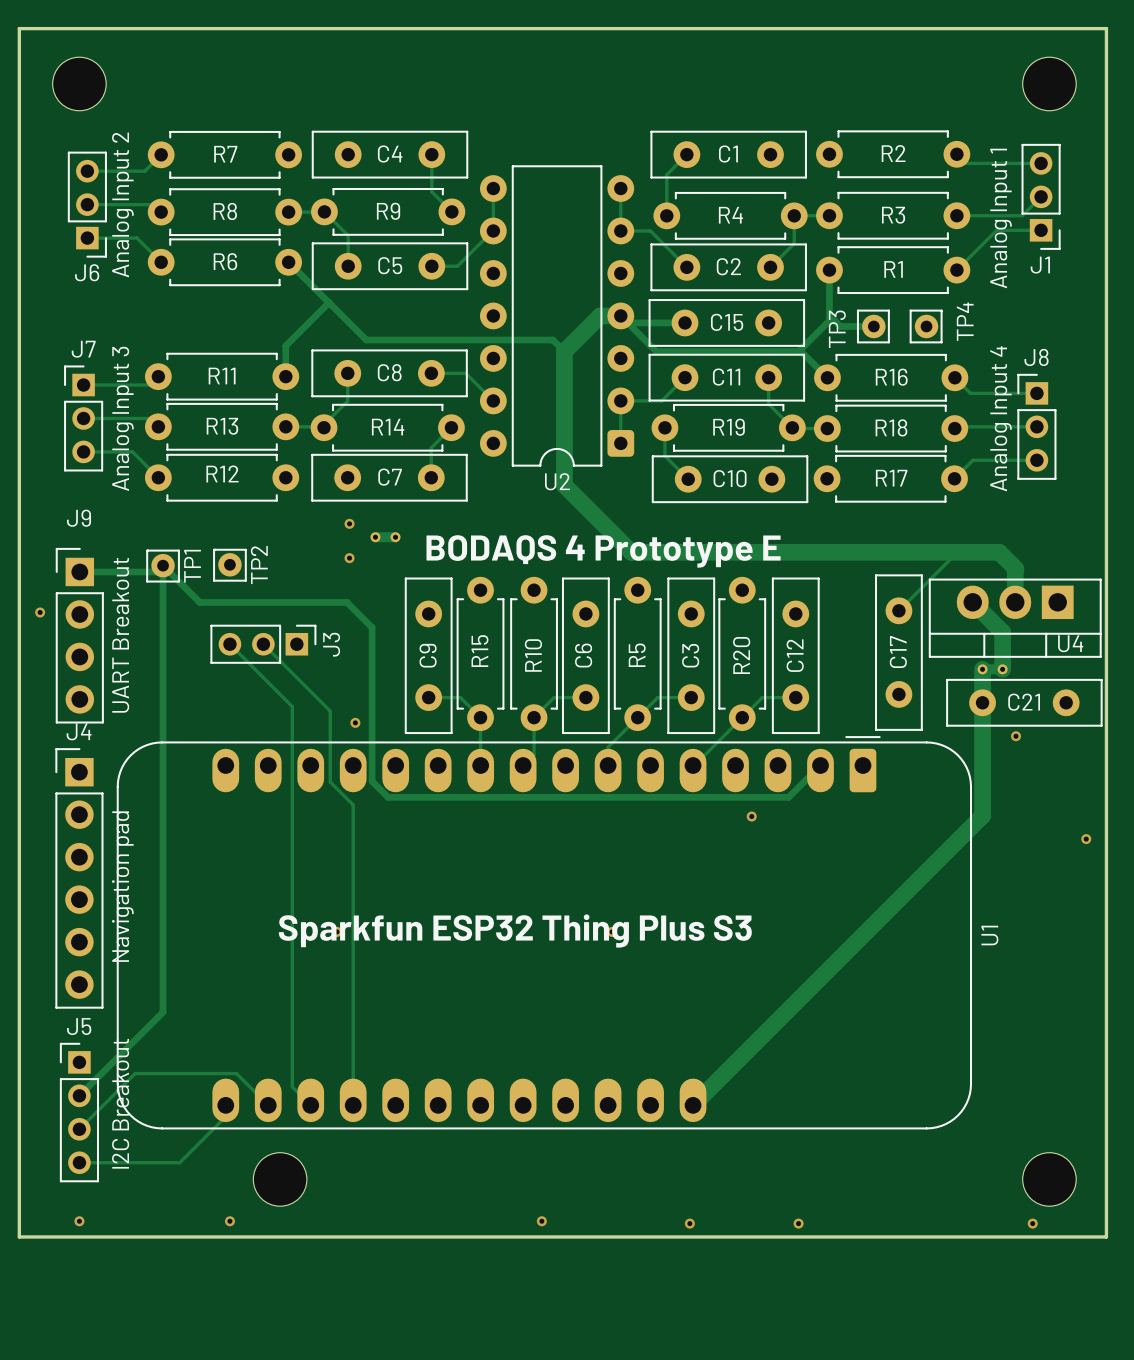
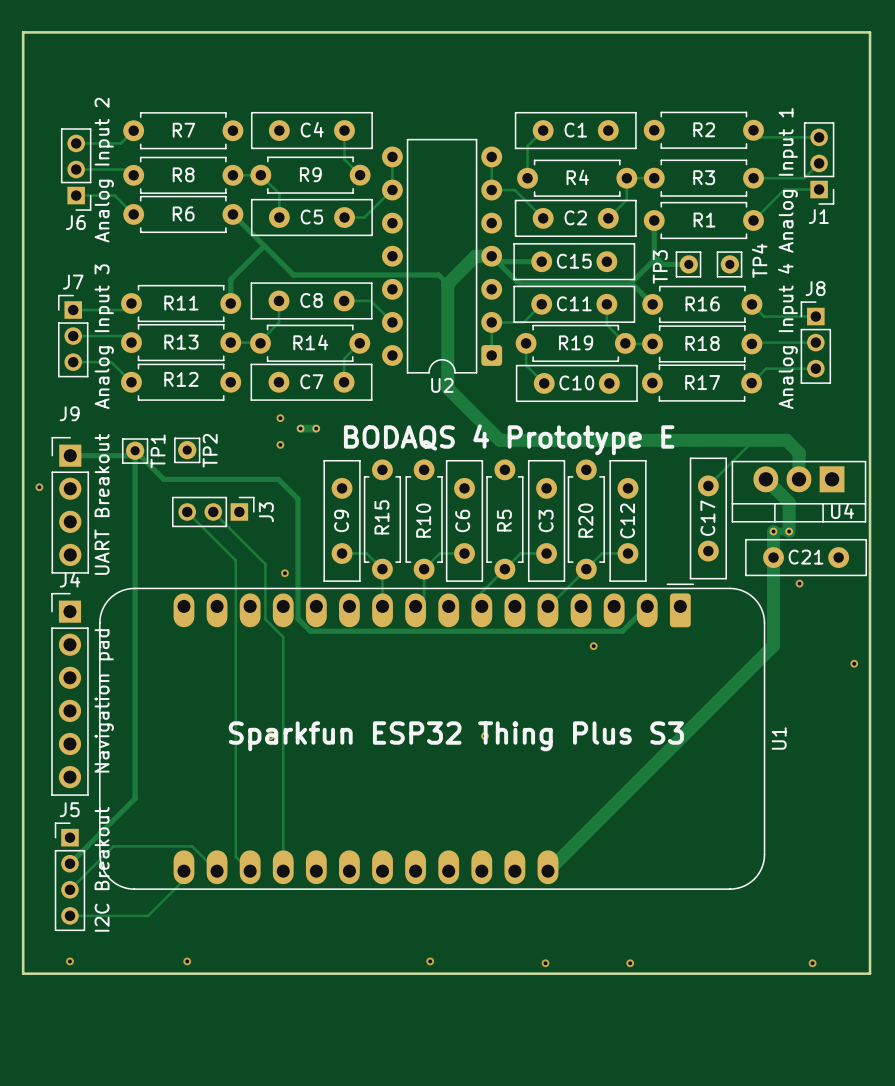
part: (79, 83) -> none
part: (1049, 83) -> none
part: (280, 1179) -> none
part: (1049, 1179) -> none

